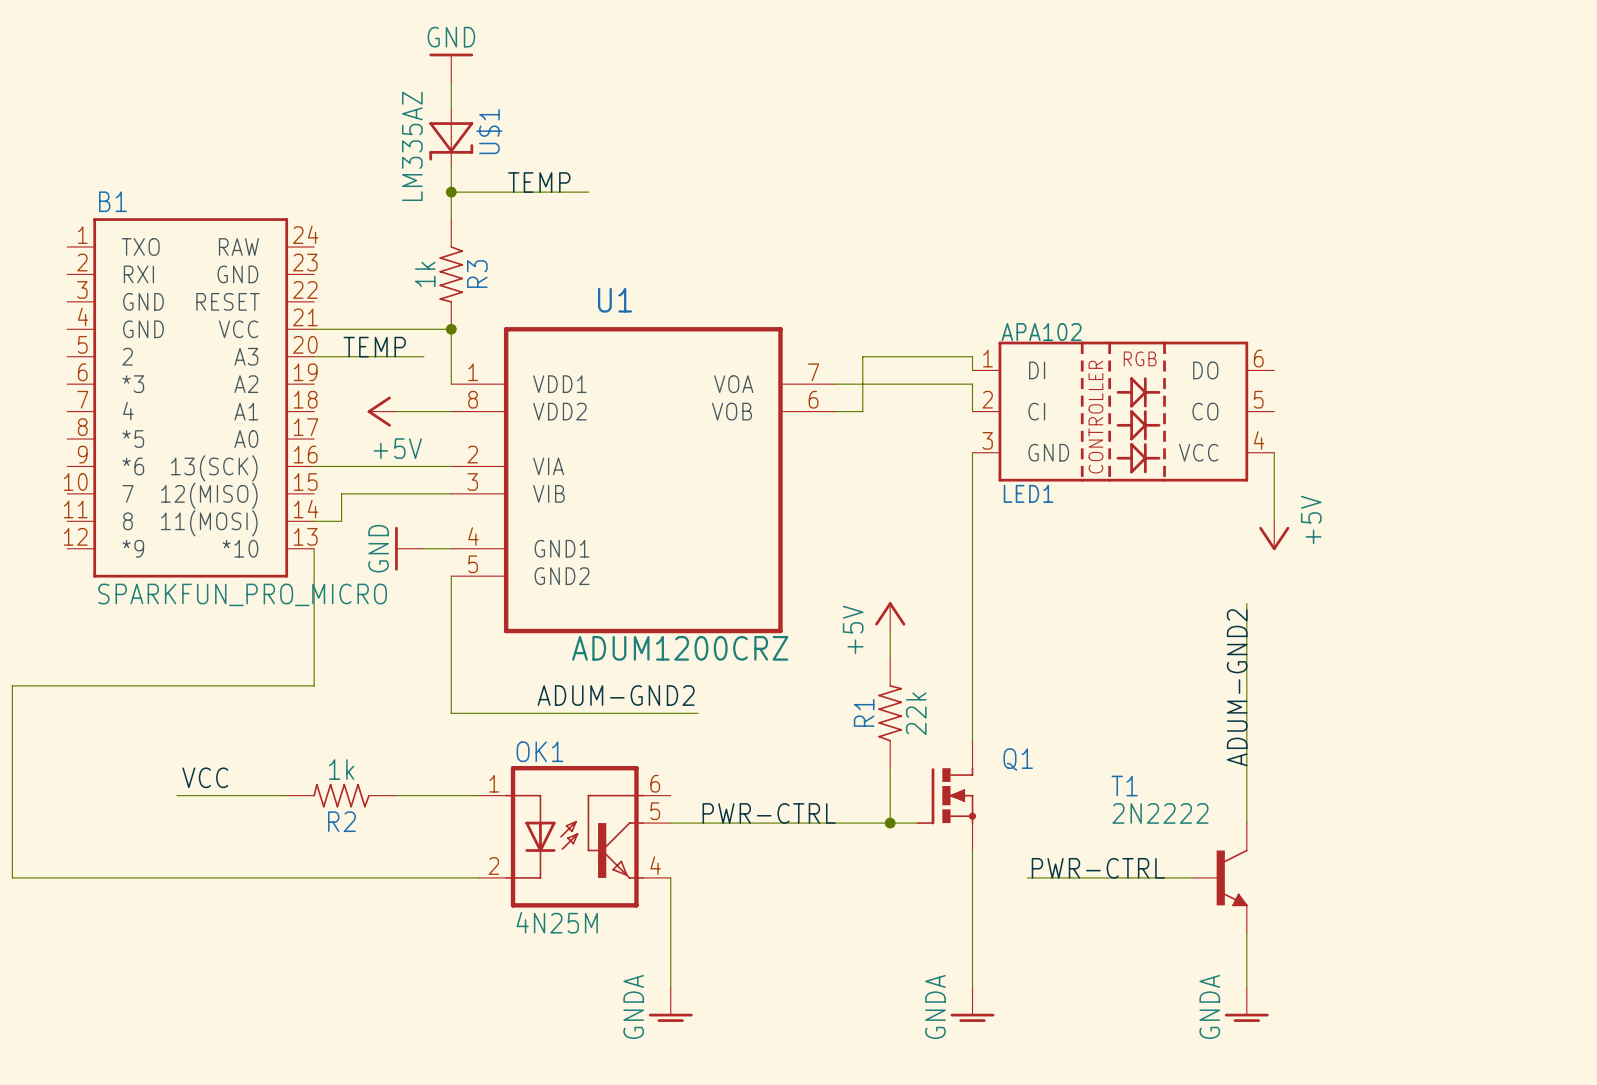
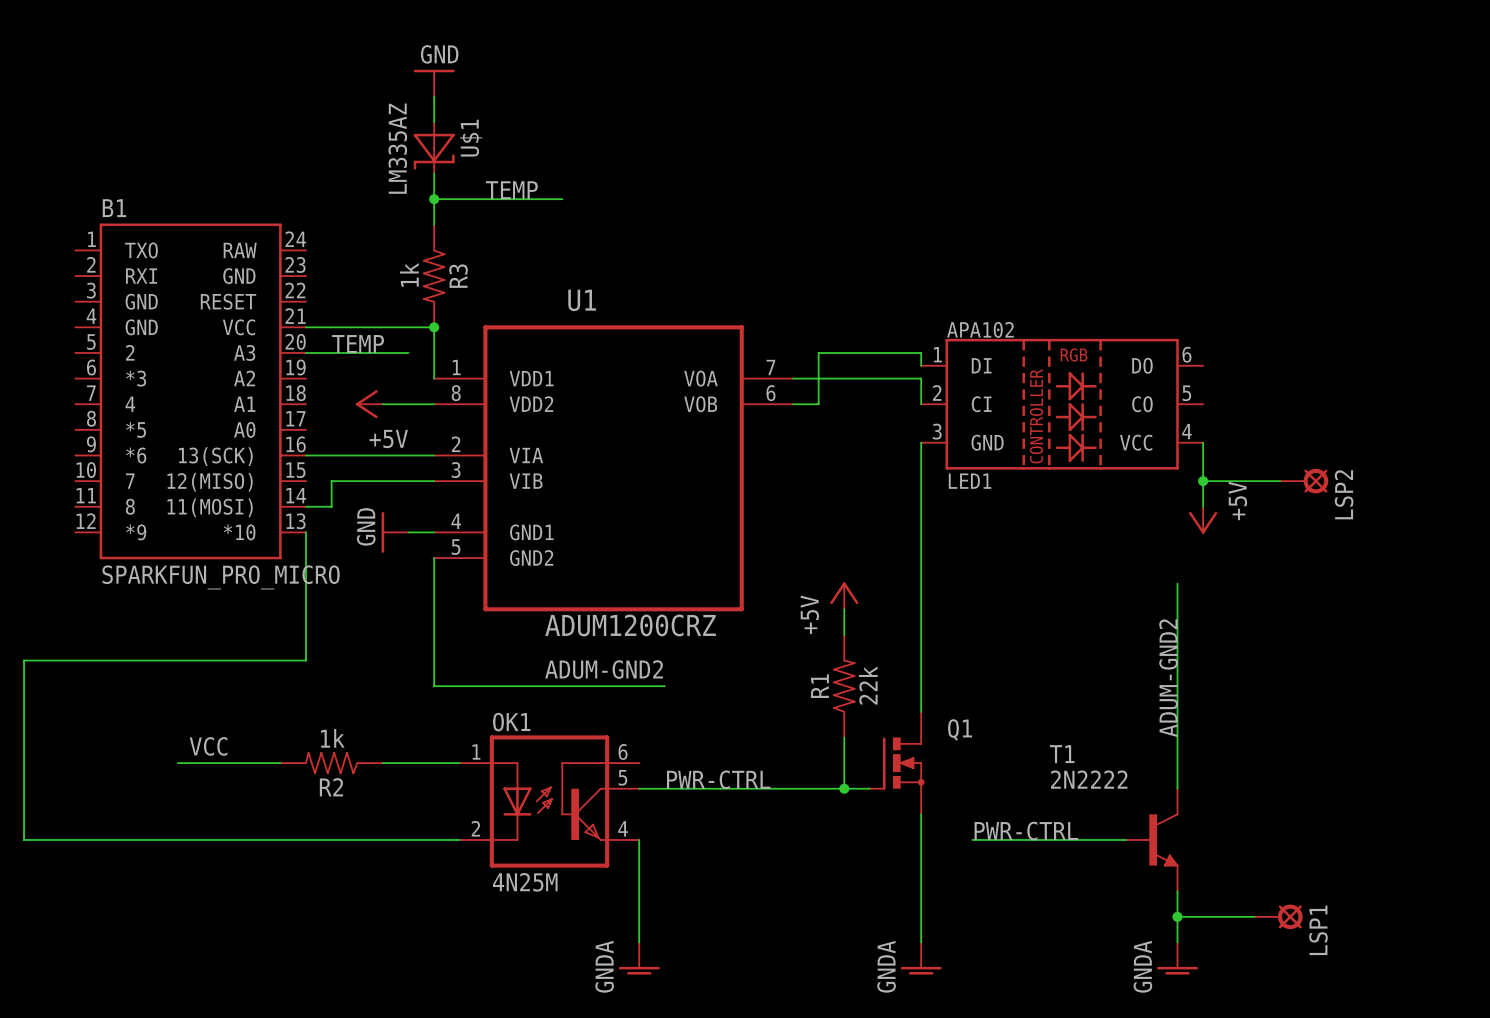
wire: none -> (1203, 481) (1280, 481)
junction: none -> (1203, 481)
LSP2: none -> (1304, 481)
wire: none -> (1177, 916) (1254, 916)
junction: none -> (1177, 916)
LSP1: none -> (1278, 916)

